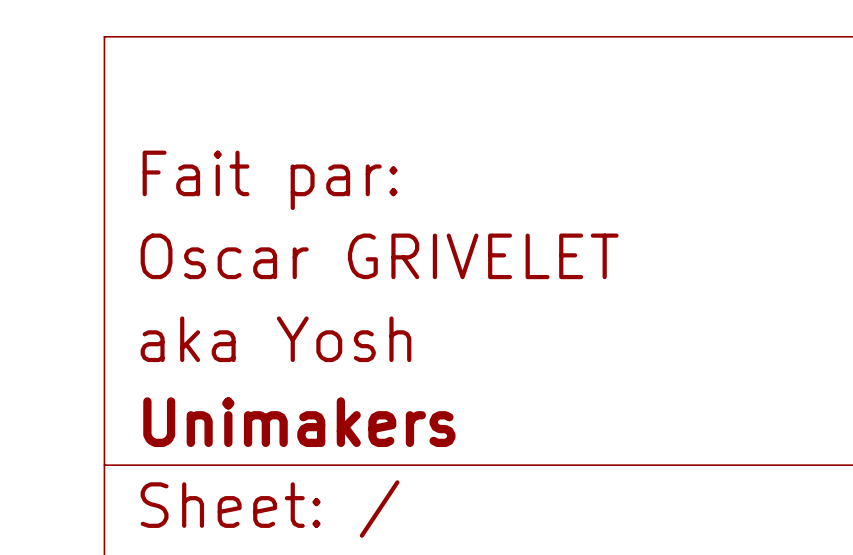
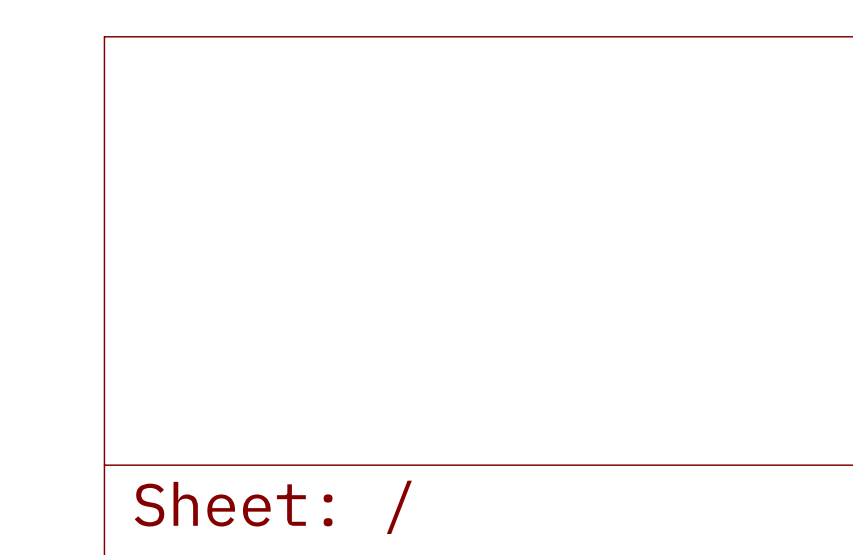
title block: Fait par: (270, 180) -> none
title block: Oscar GRIVELET (379, 256) -> none
title block: aka Yosh (275, 339) -> none
title block: Unimakers (299, 422) -> none

